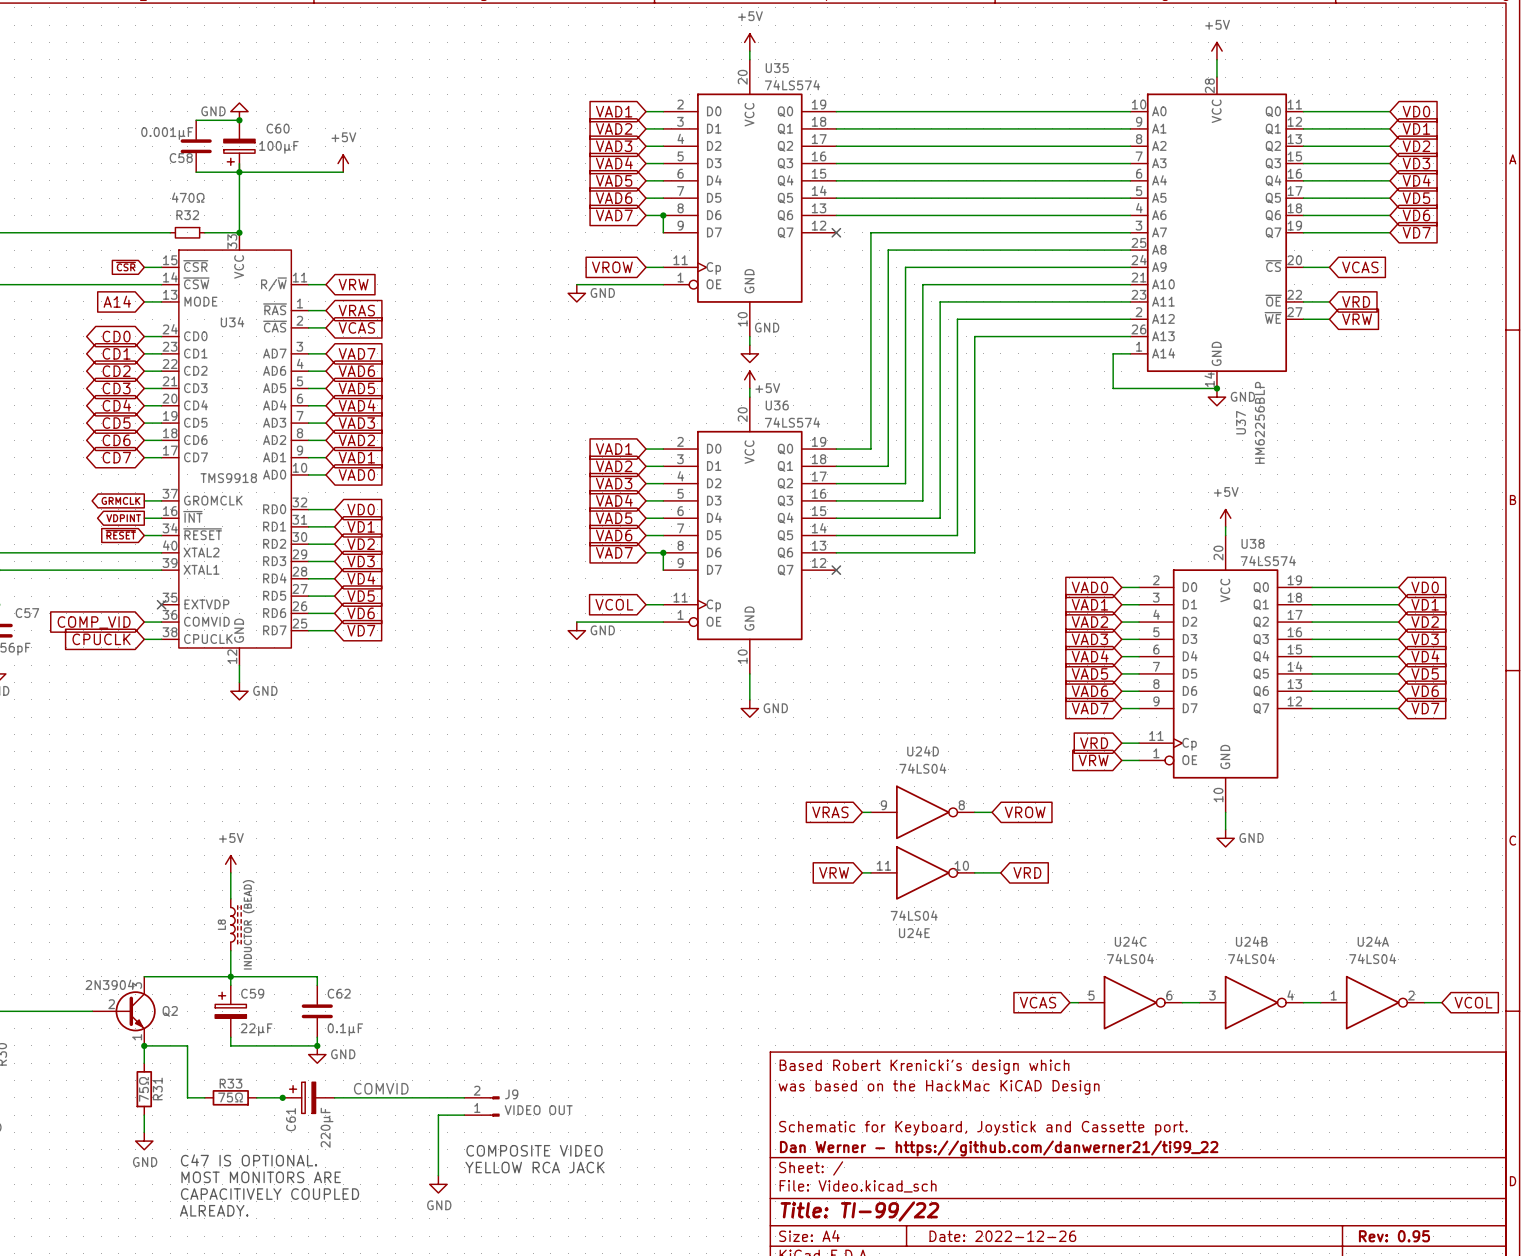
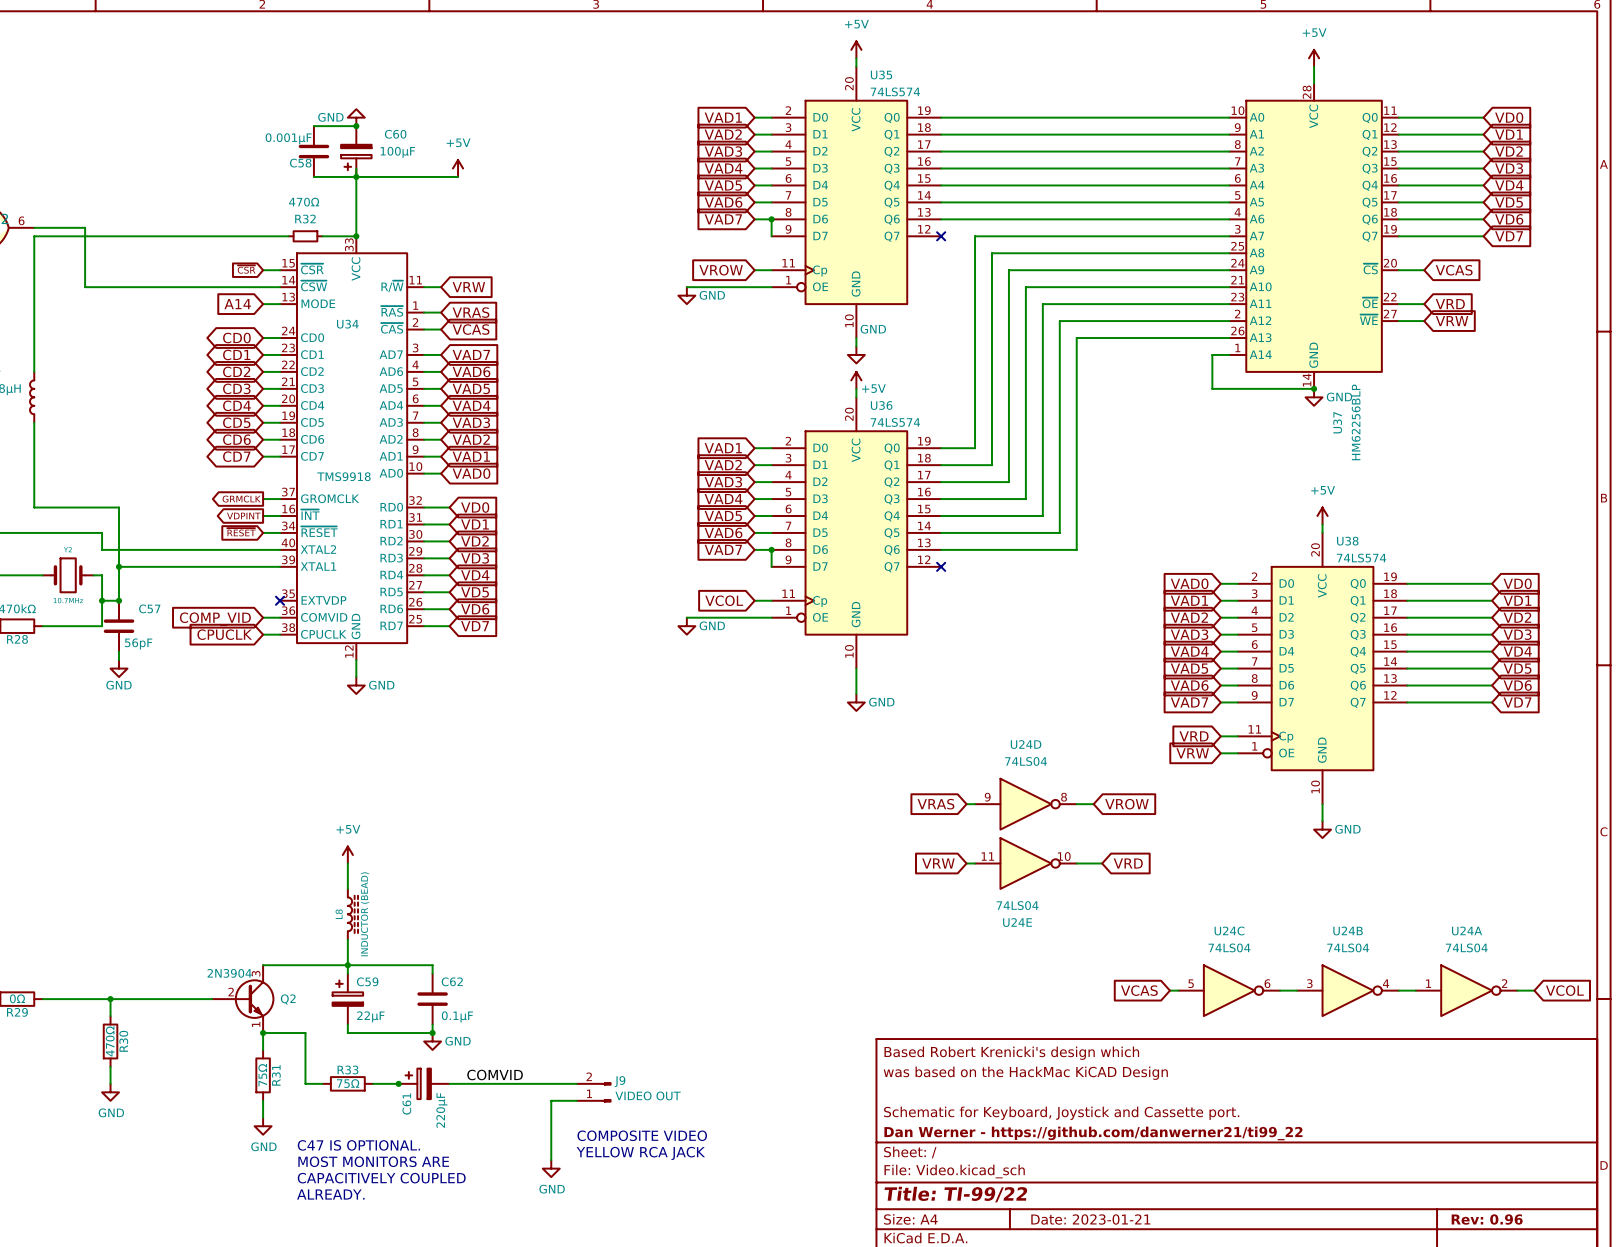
title block: Date: 2022-12-26 (1002, 1236) -> Date: 2023-01-21 (1090, 1219)
title block: Rev: 0.95 (1394, 1236) -> Rev: 0.96 (1487, 1219)

